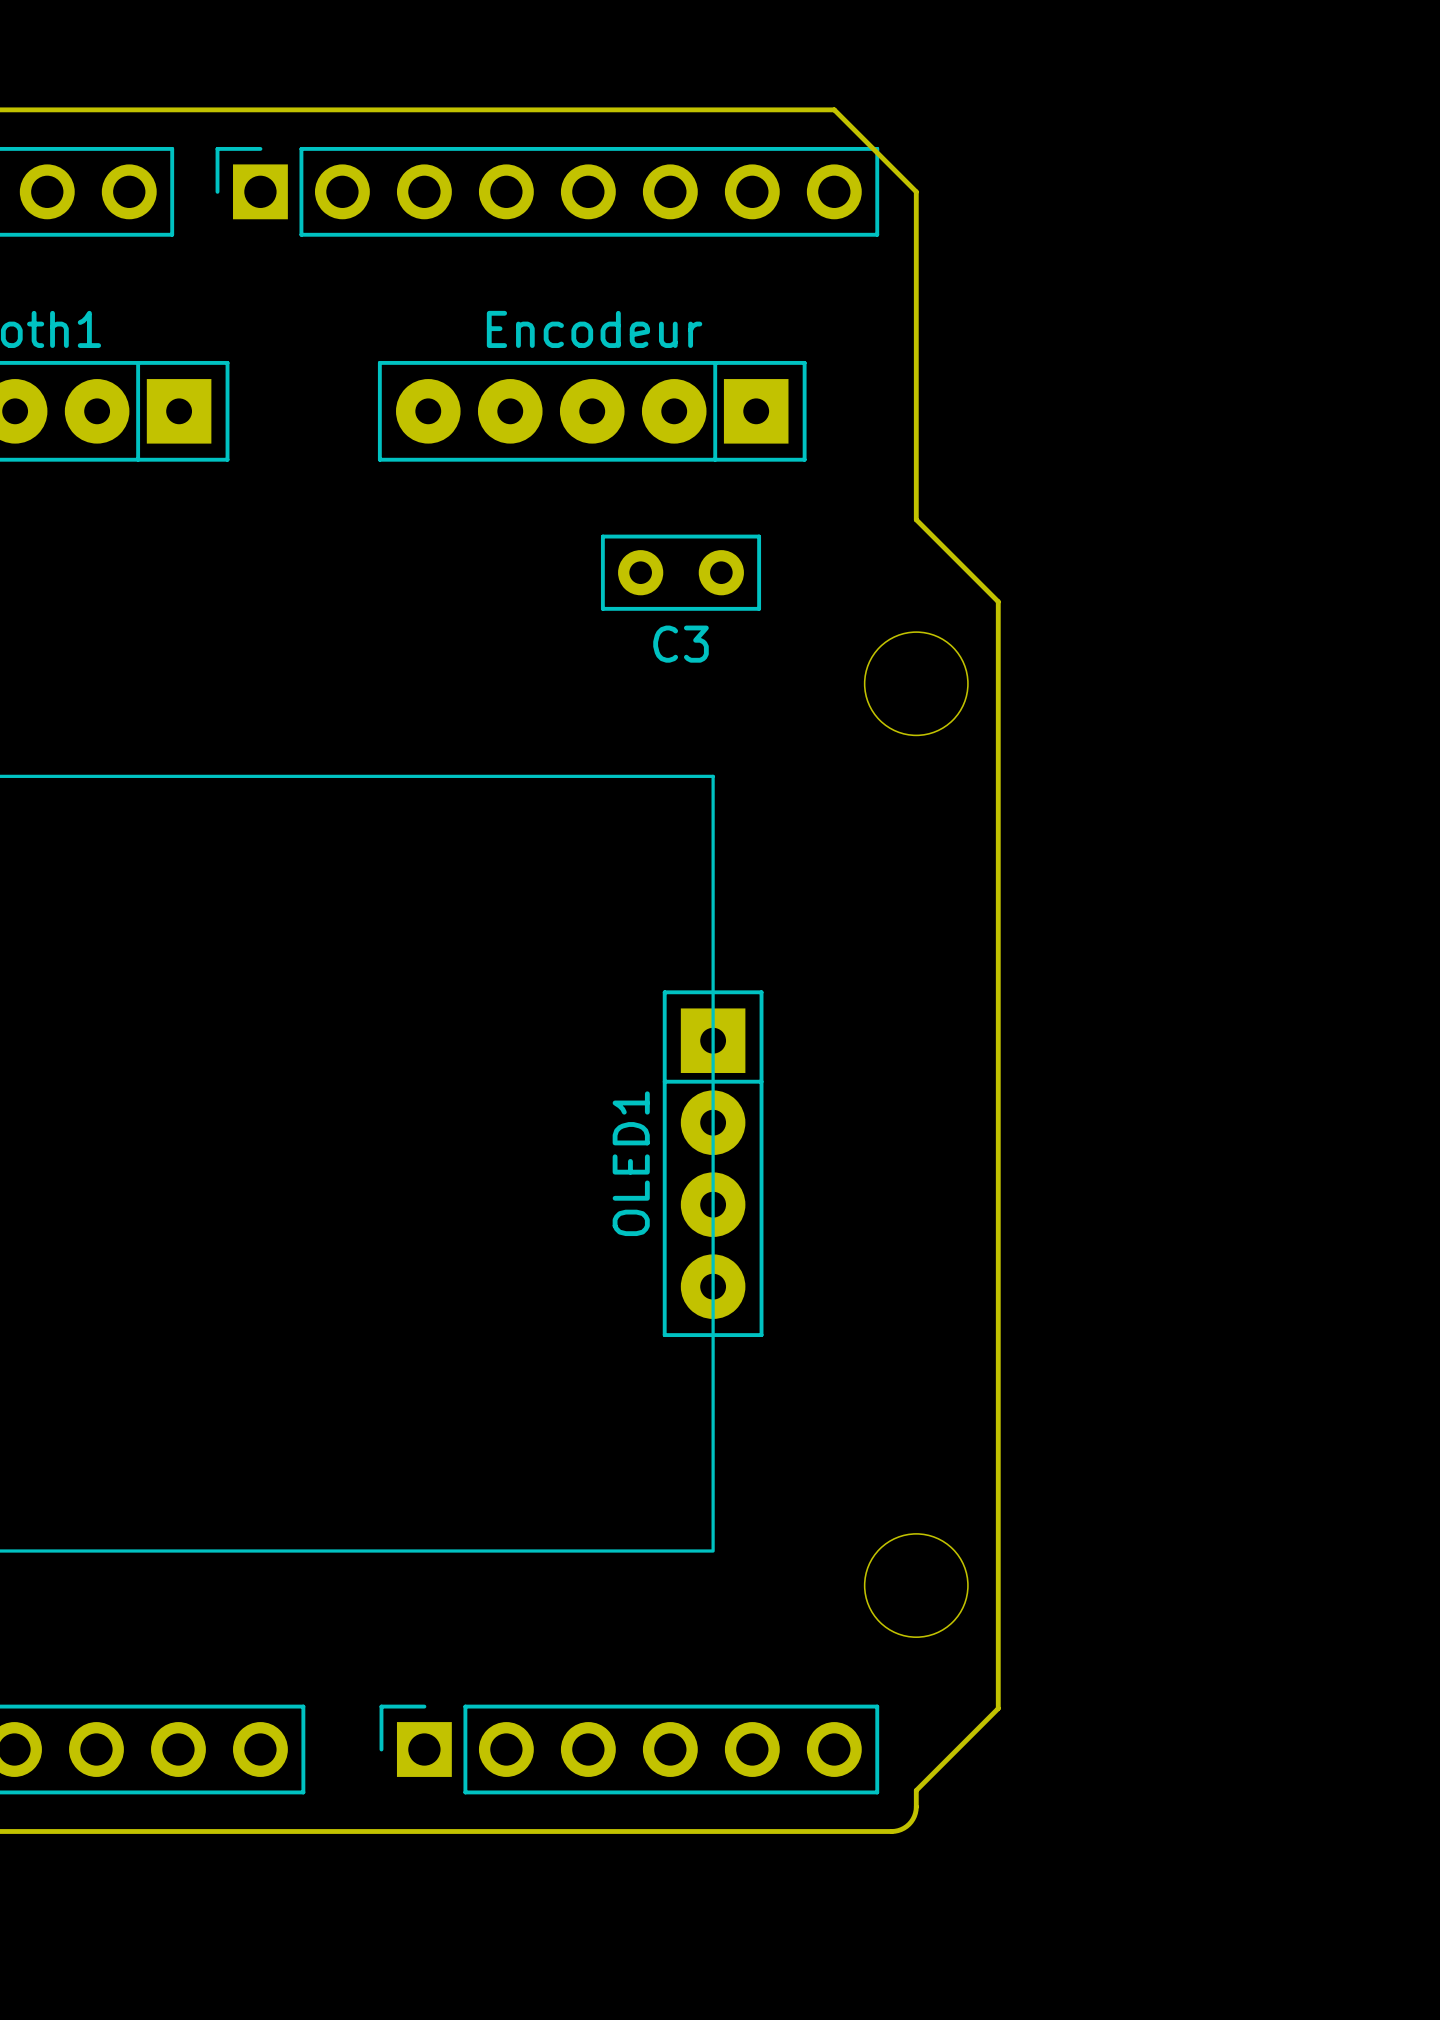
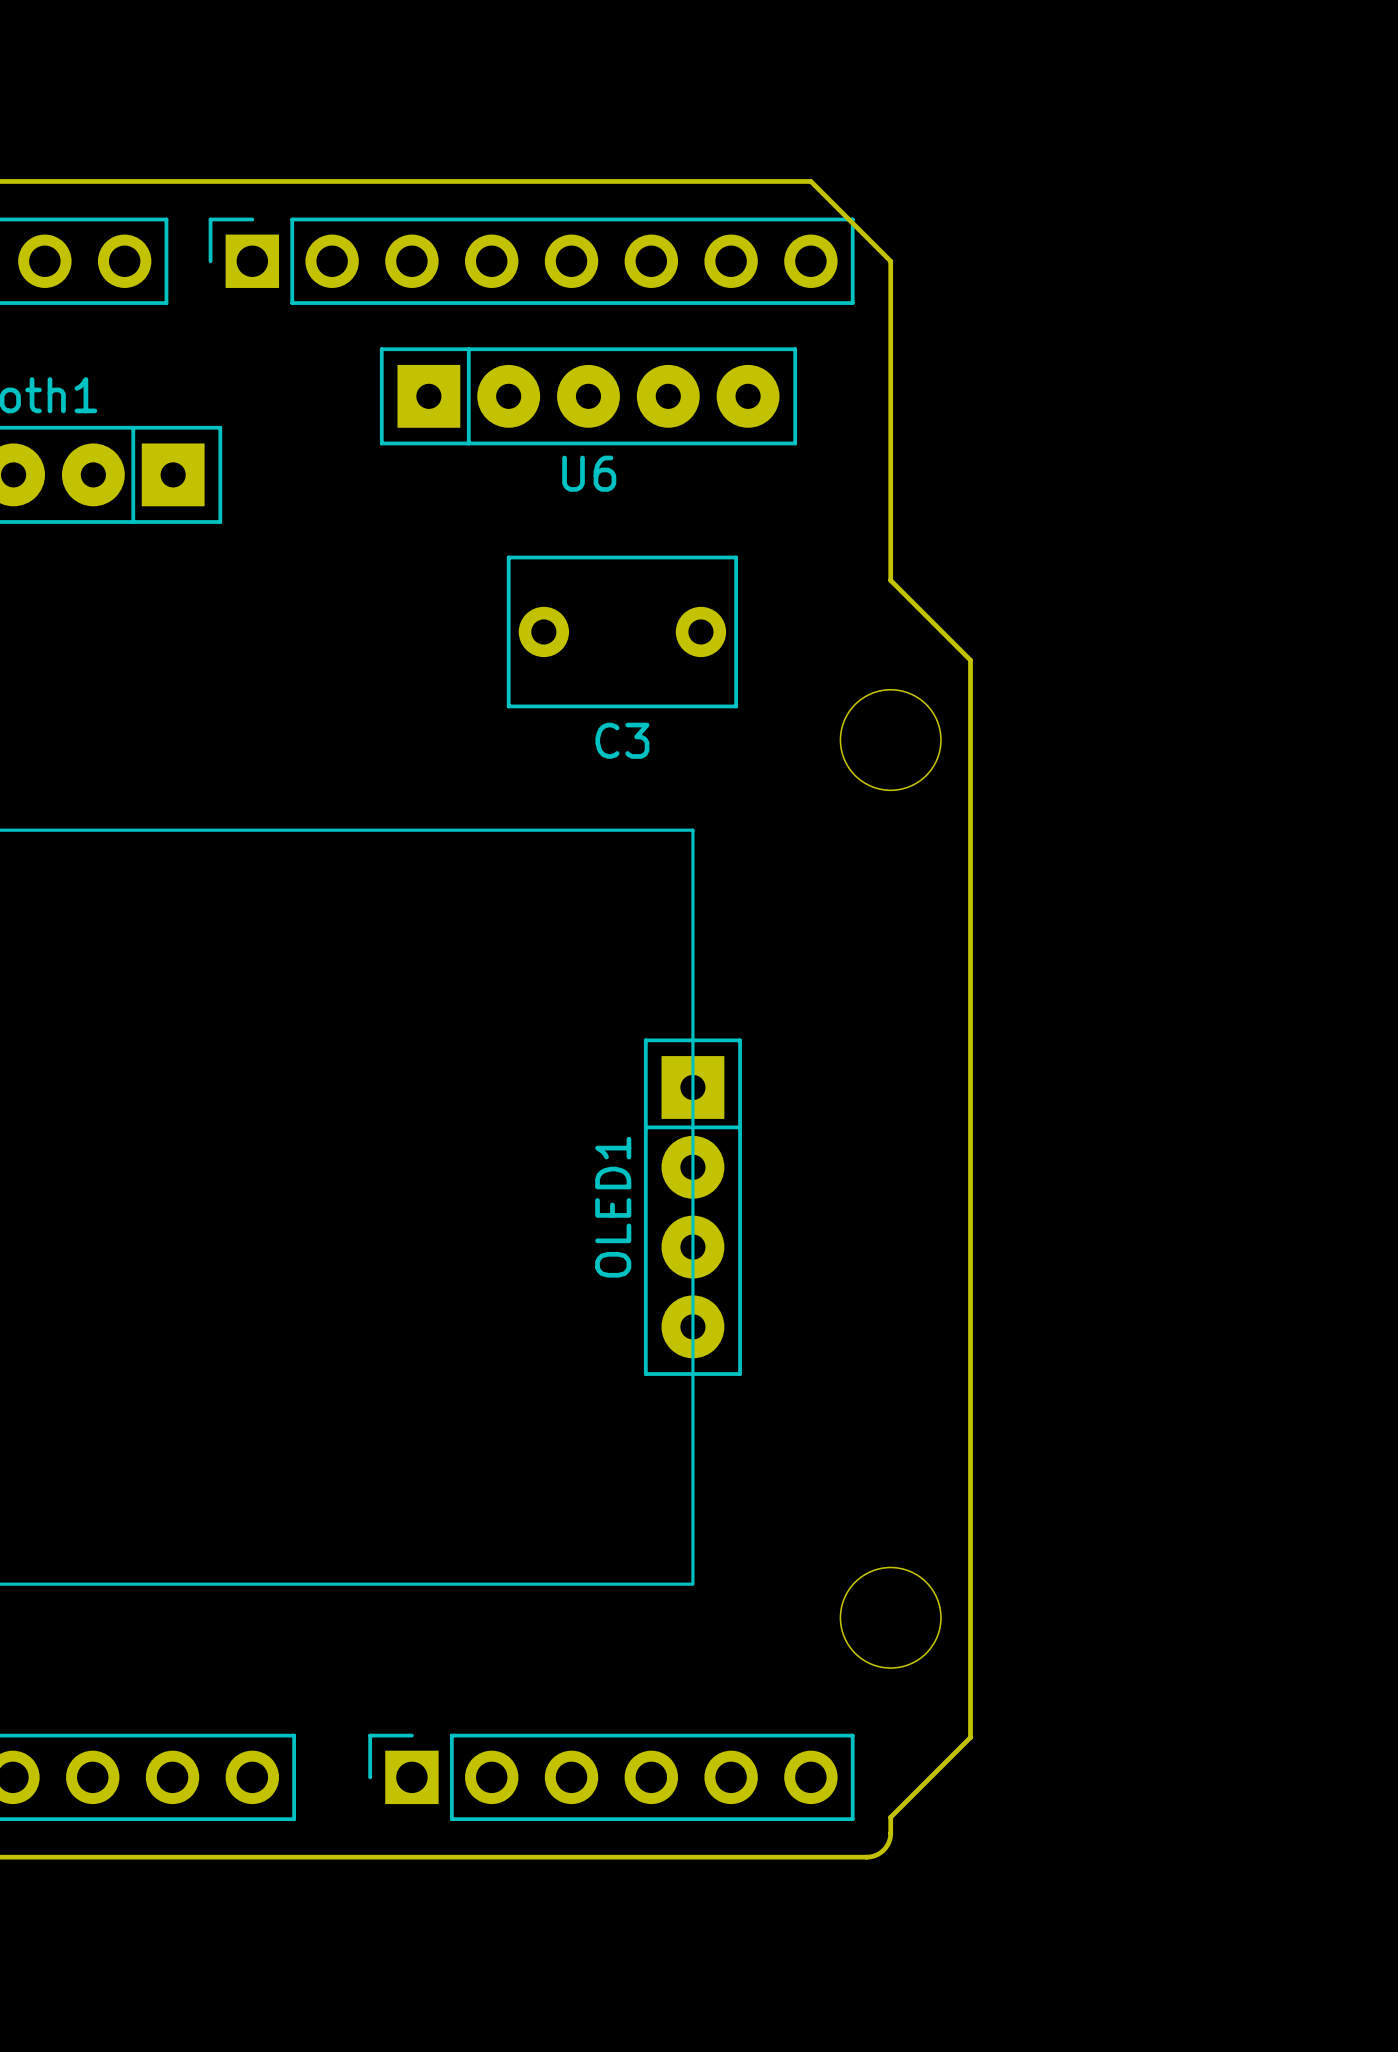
U6: none -> (588, 396)
Encodeur: (592, 411) -> none
C3 footprint: [600, 534, 762, 611] -> [506, 555, 739, 709]

